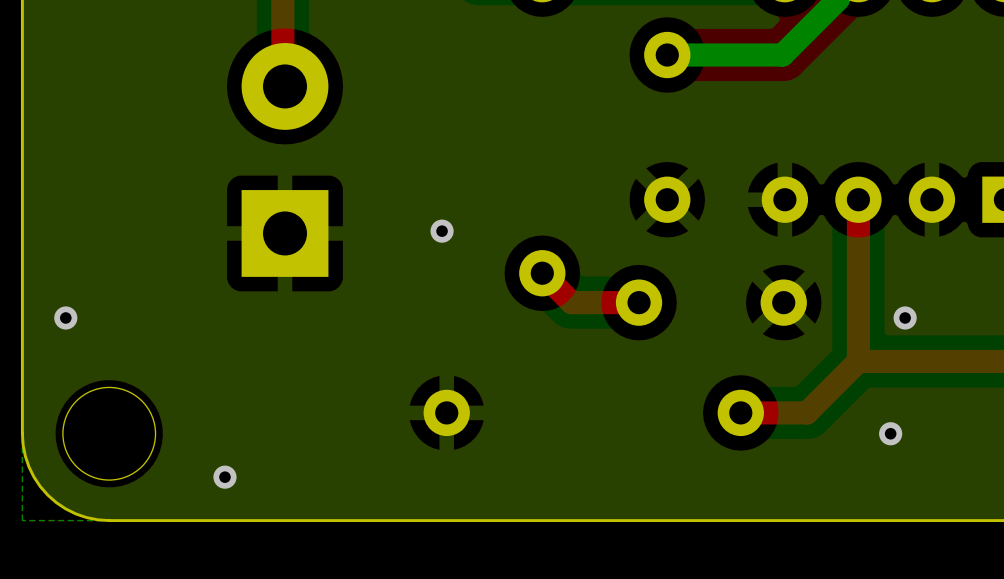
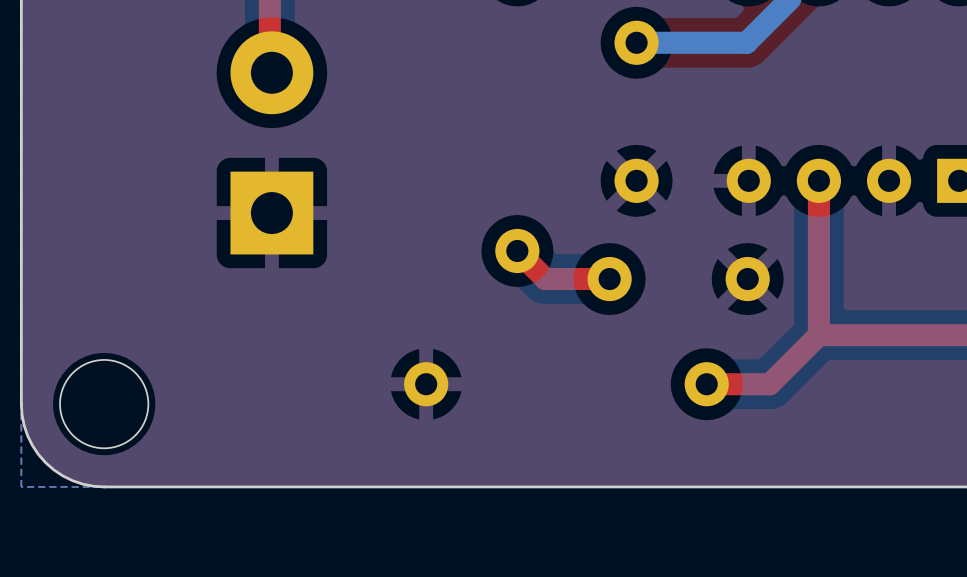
via: (442, 231) -> none
via: (65, 317) -> none
via: (905, 317) -> none
via: (890, 433) -> none
via: (224, 477) -> none

